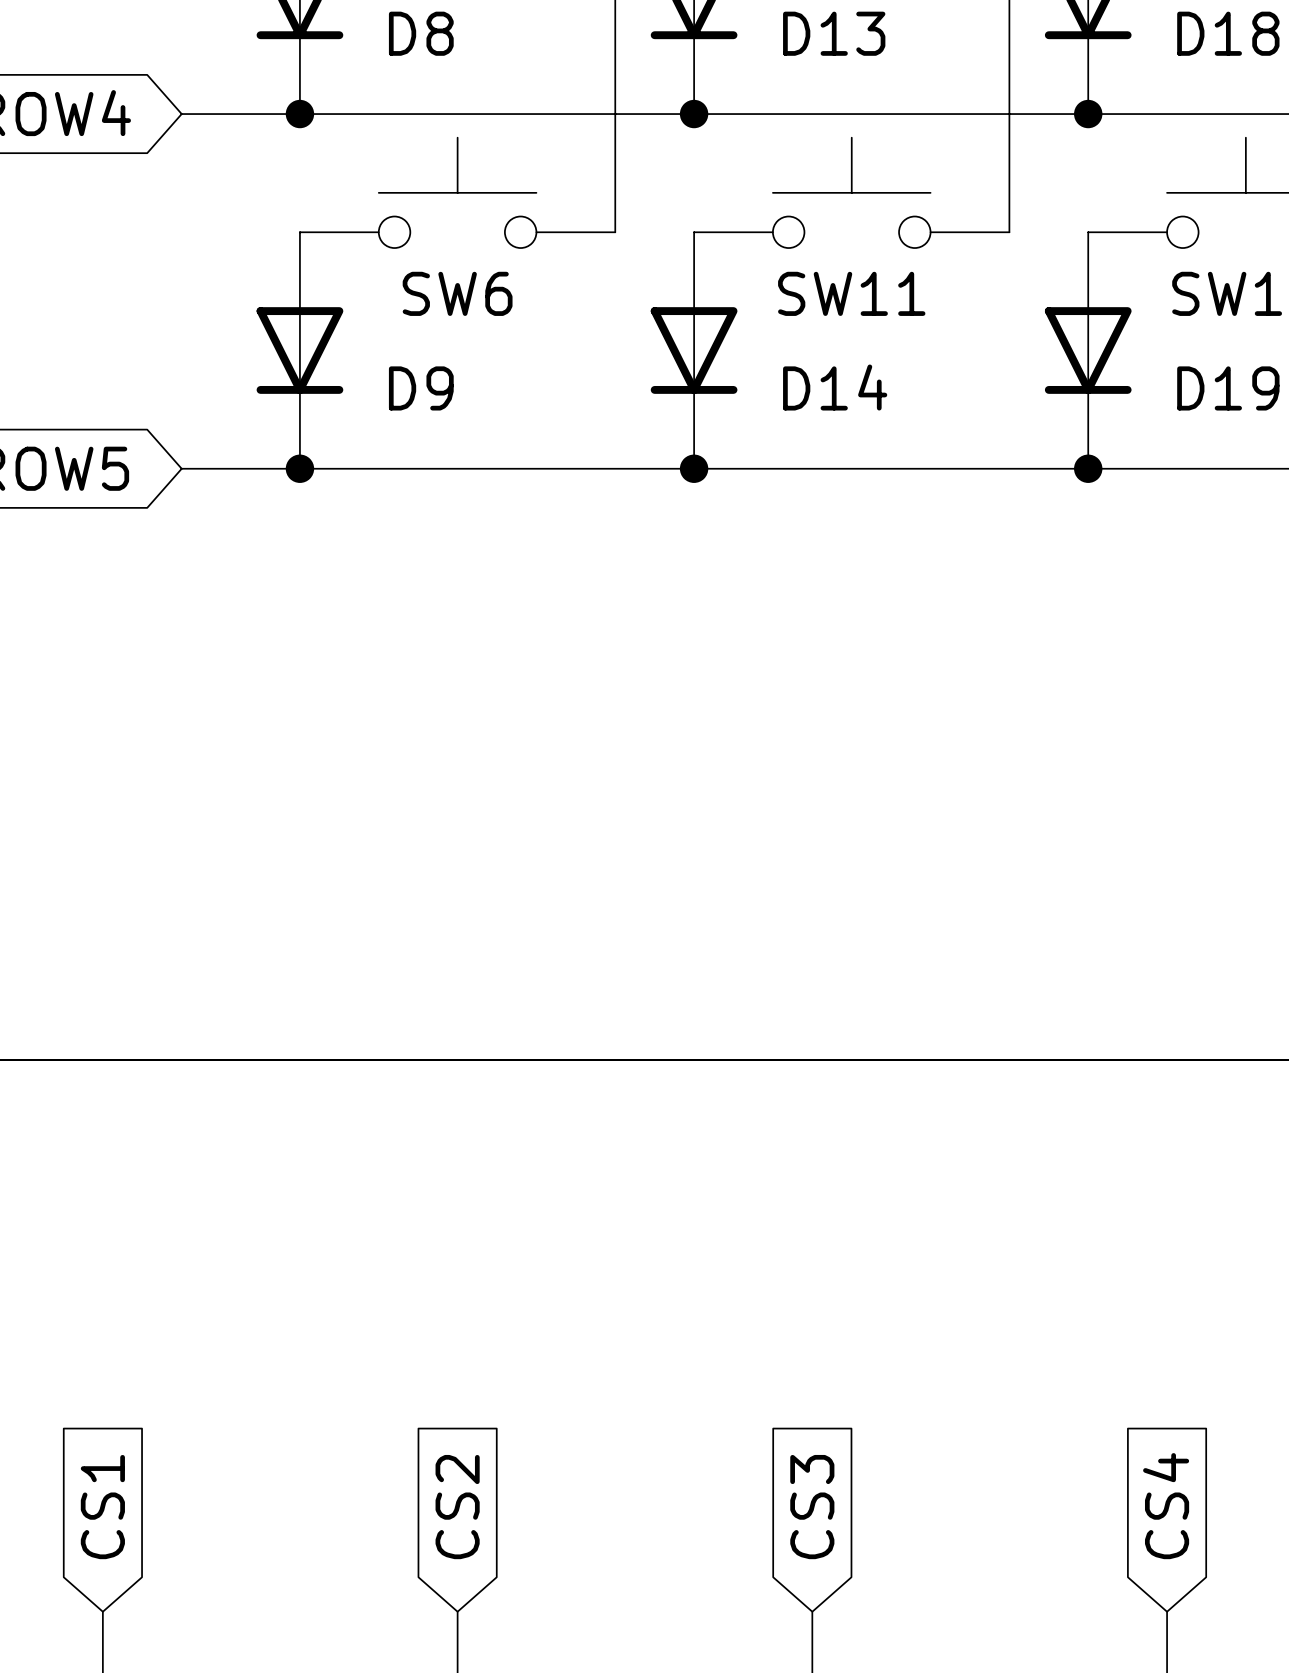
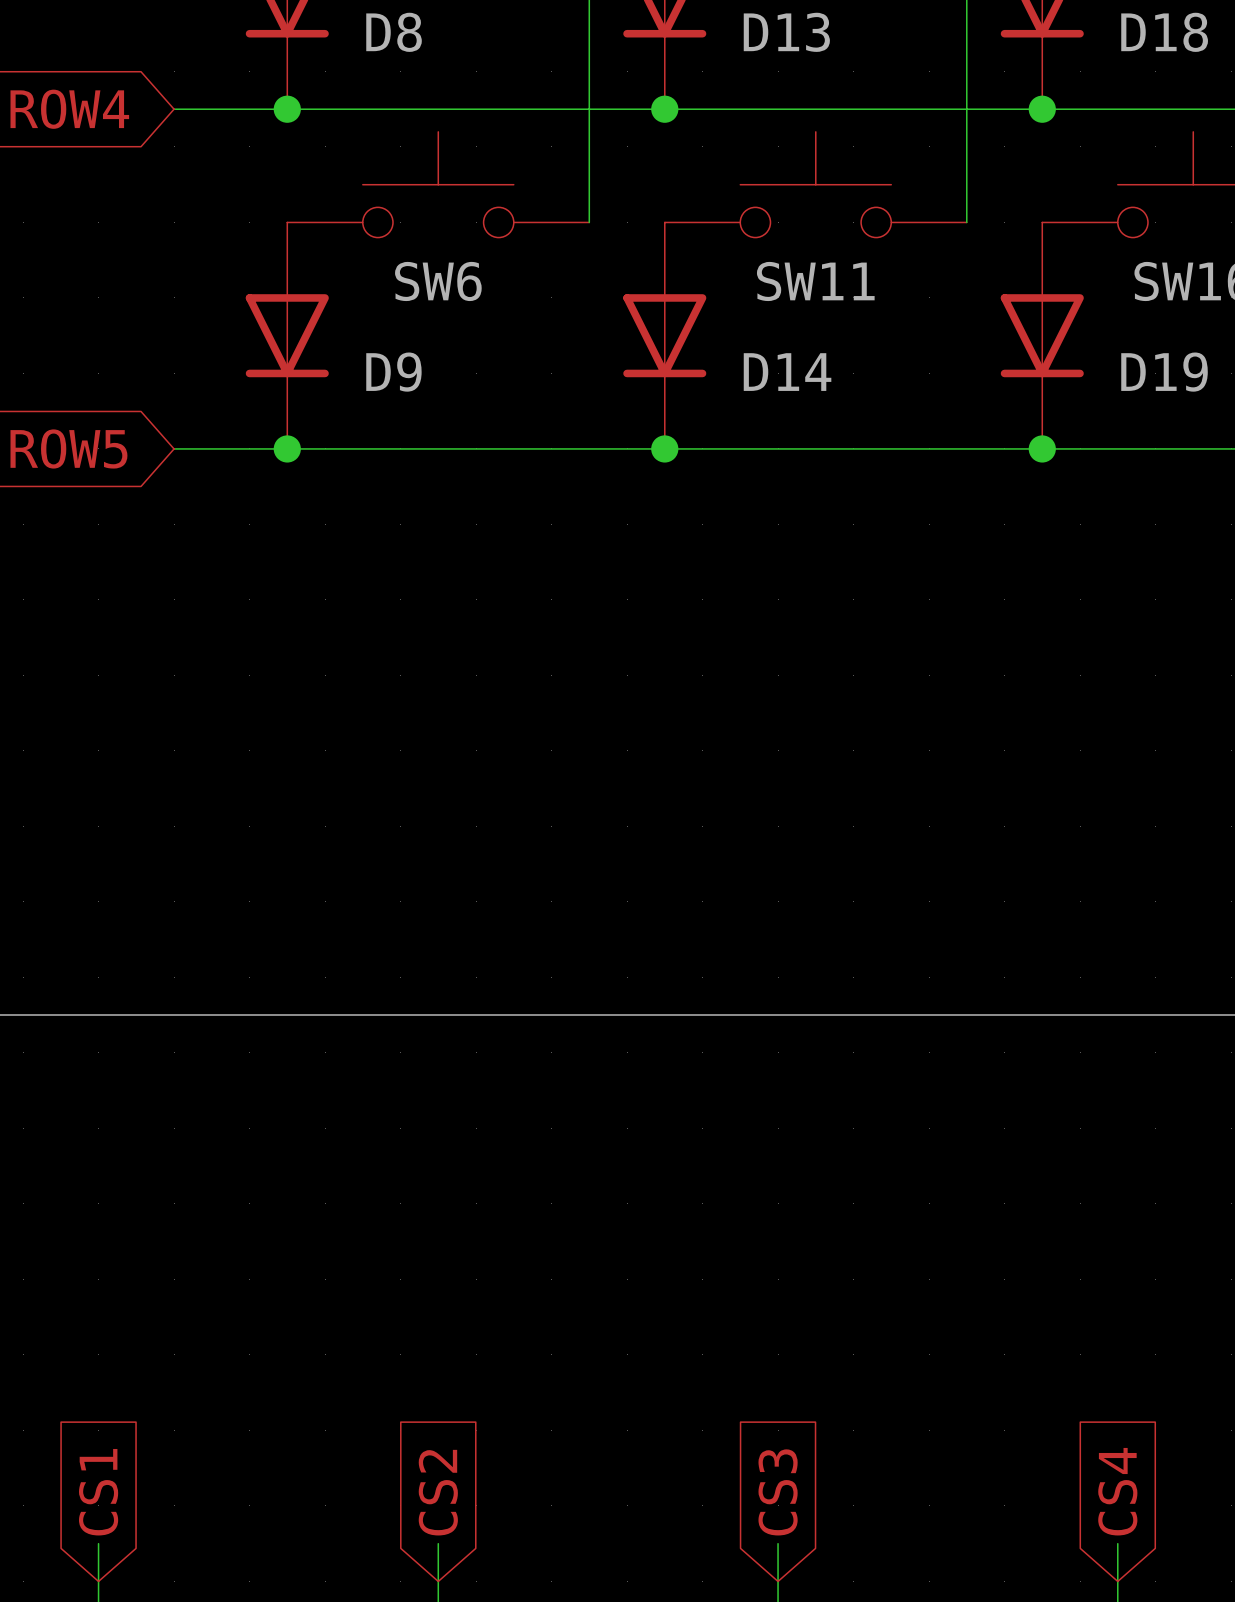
global label position: CS4 (1166, 1506) -> CS4 (1117, 1491)
global label position: CS1 (102, 1507) -> CS1 (98, 1492)
global label position: CS2 (457, 1507) -> CS2 (438, 1492)
global label position: CS3 (812, 1507) -> CS3 (778, 1492)

